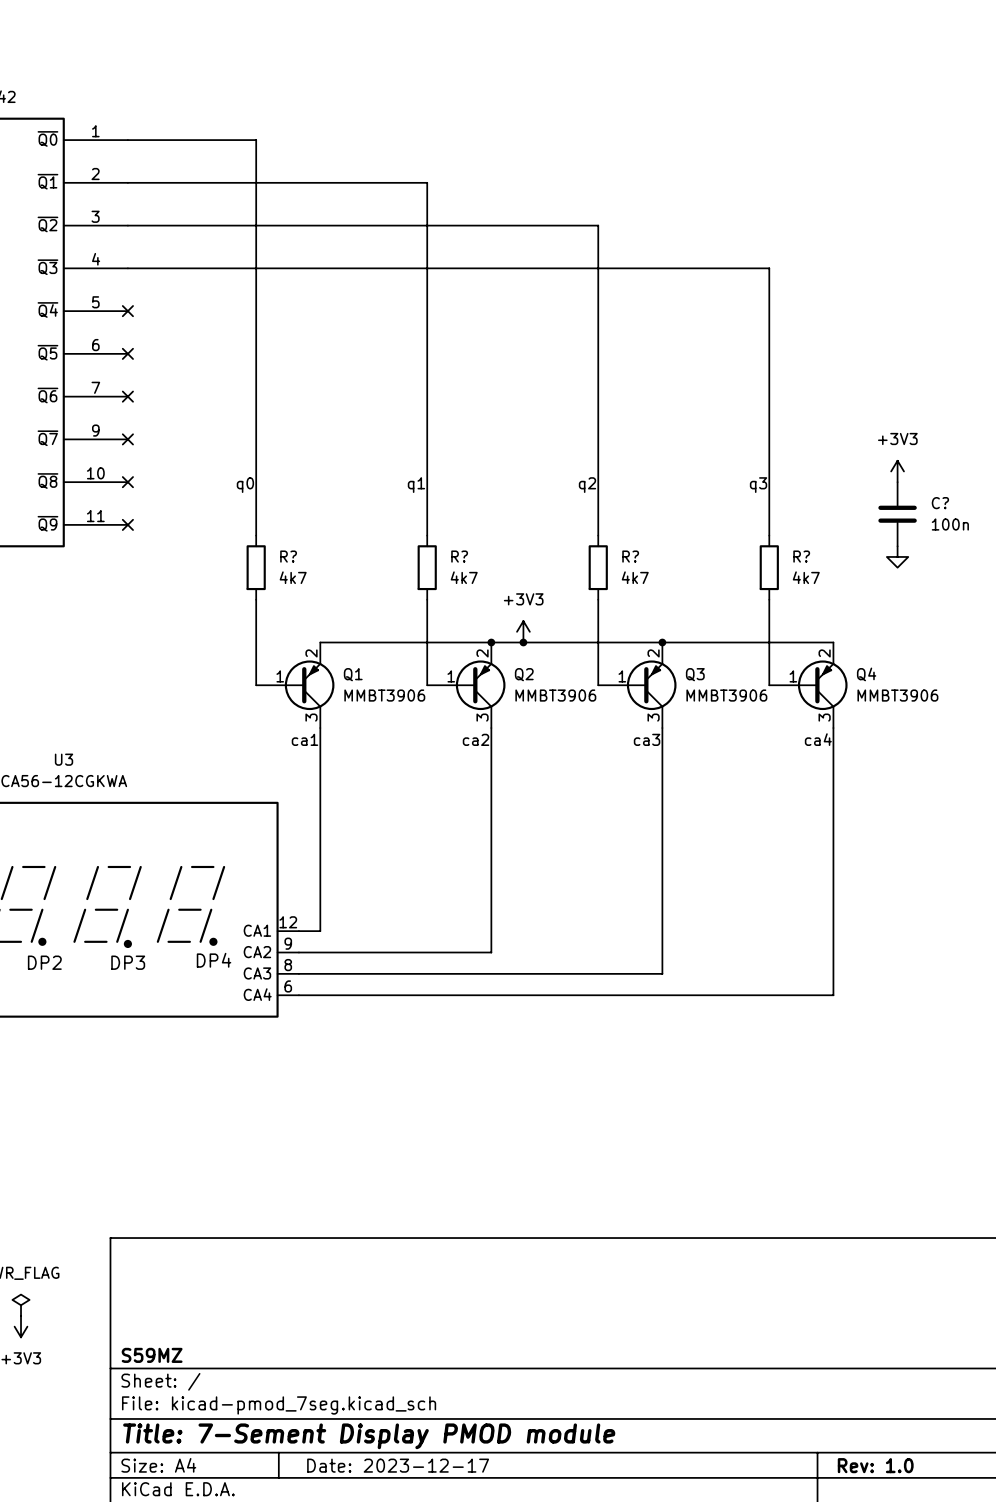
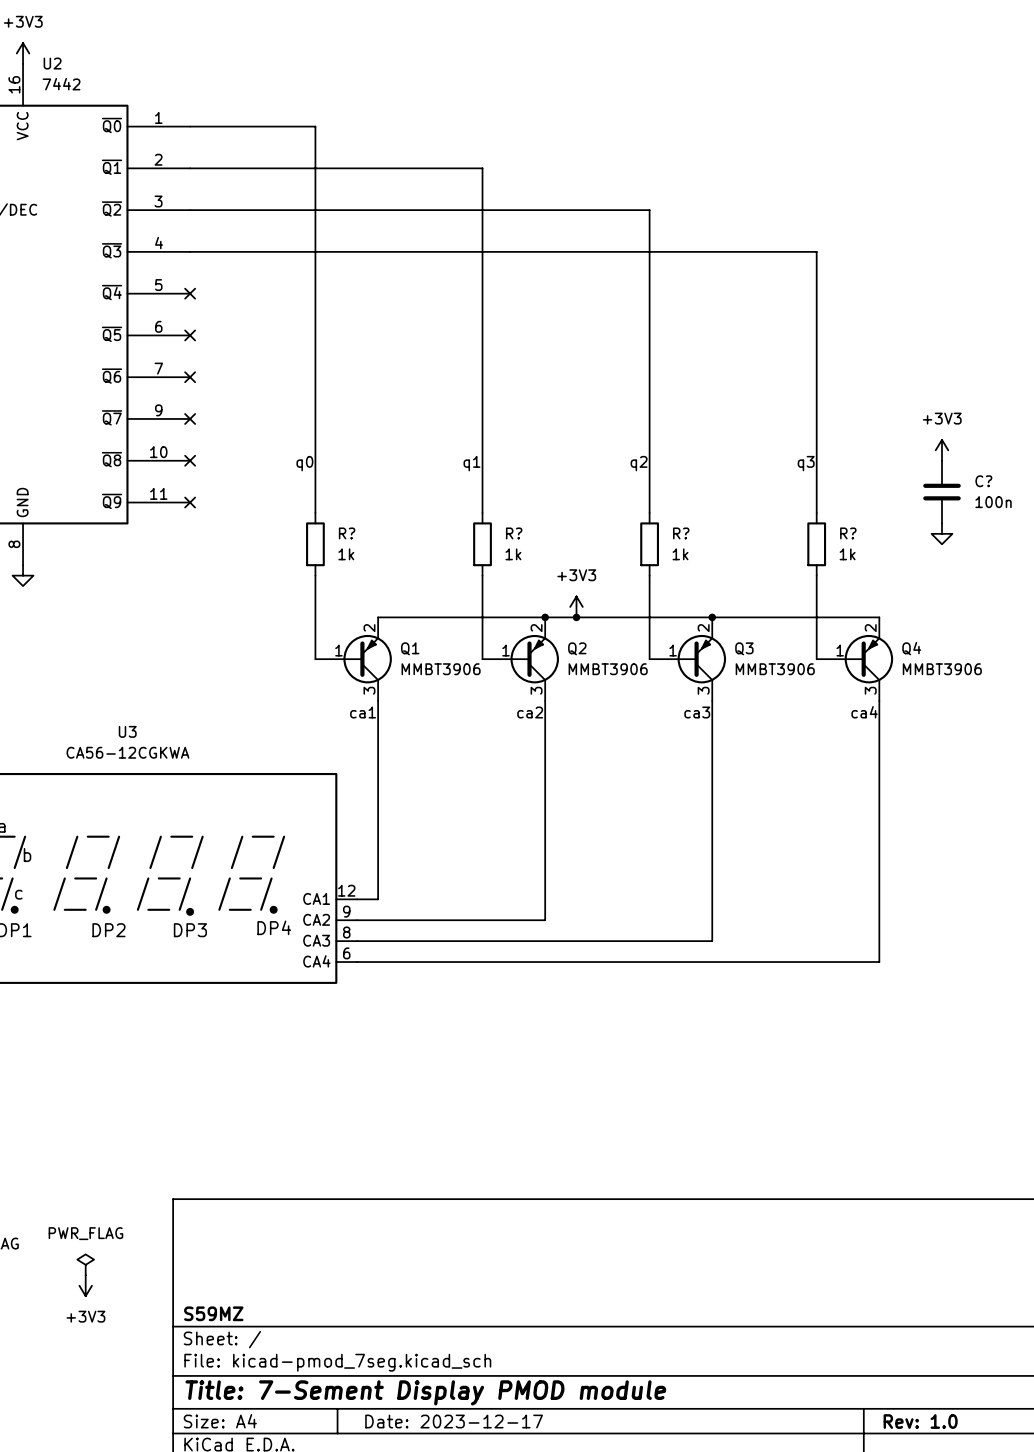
R? value: 4k7 (293, 577) -> 1k (346, 554)
R? value: 4k7 (464, 577) -> 1k (513, 554)
R? value: 4k7 (635, 577) -> 1k (680, 554)
R? value: 4k7 (806, 577) -> 1k (847, 554)

